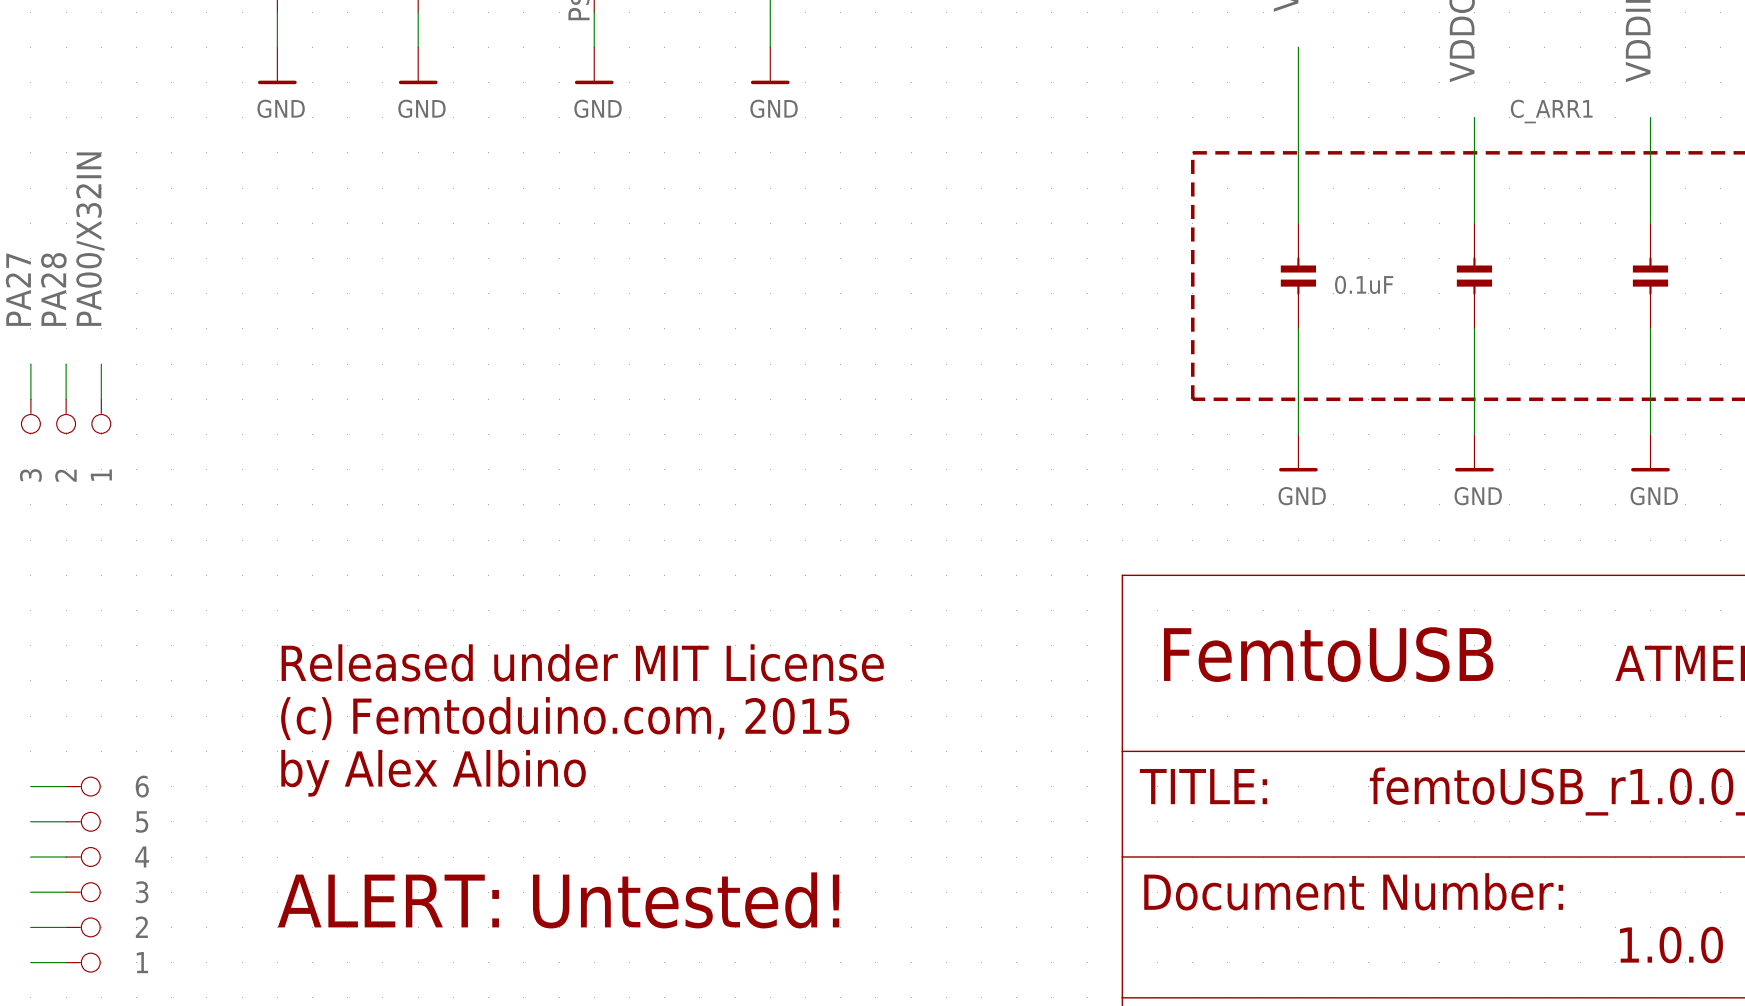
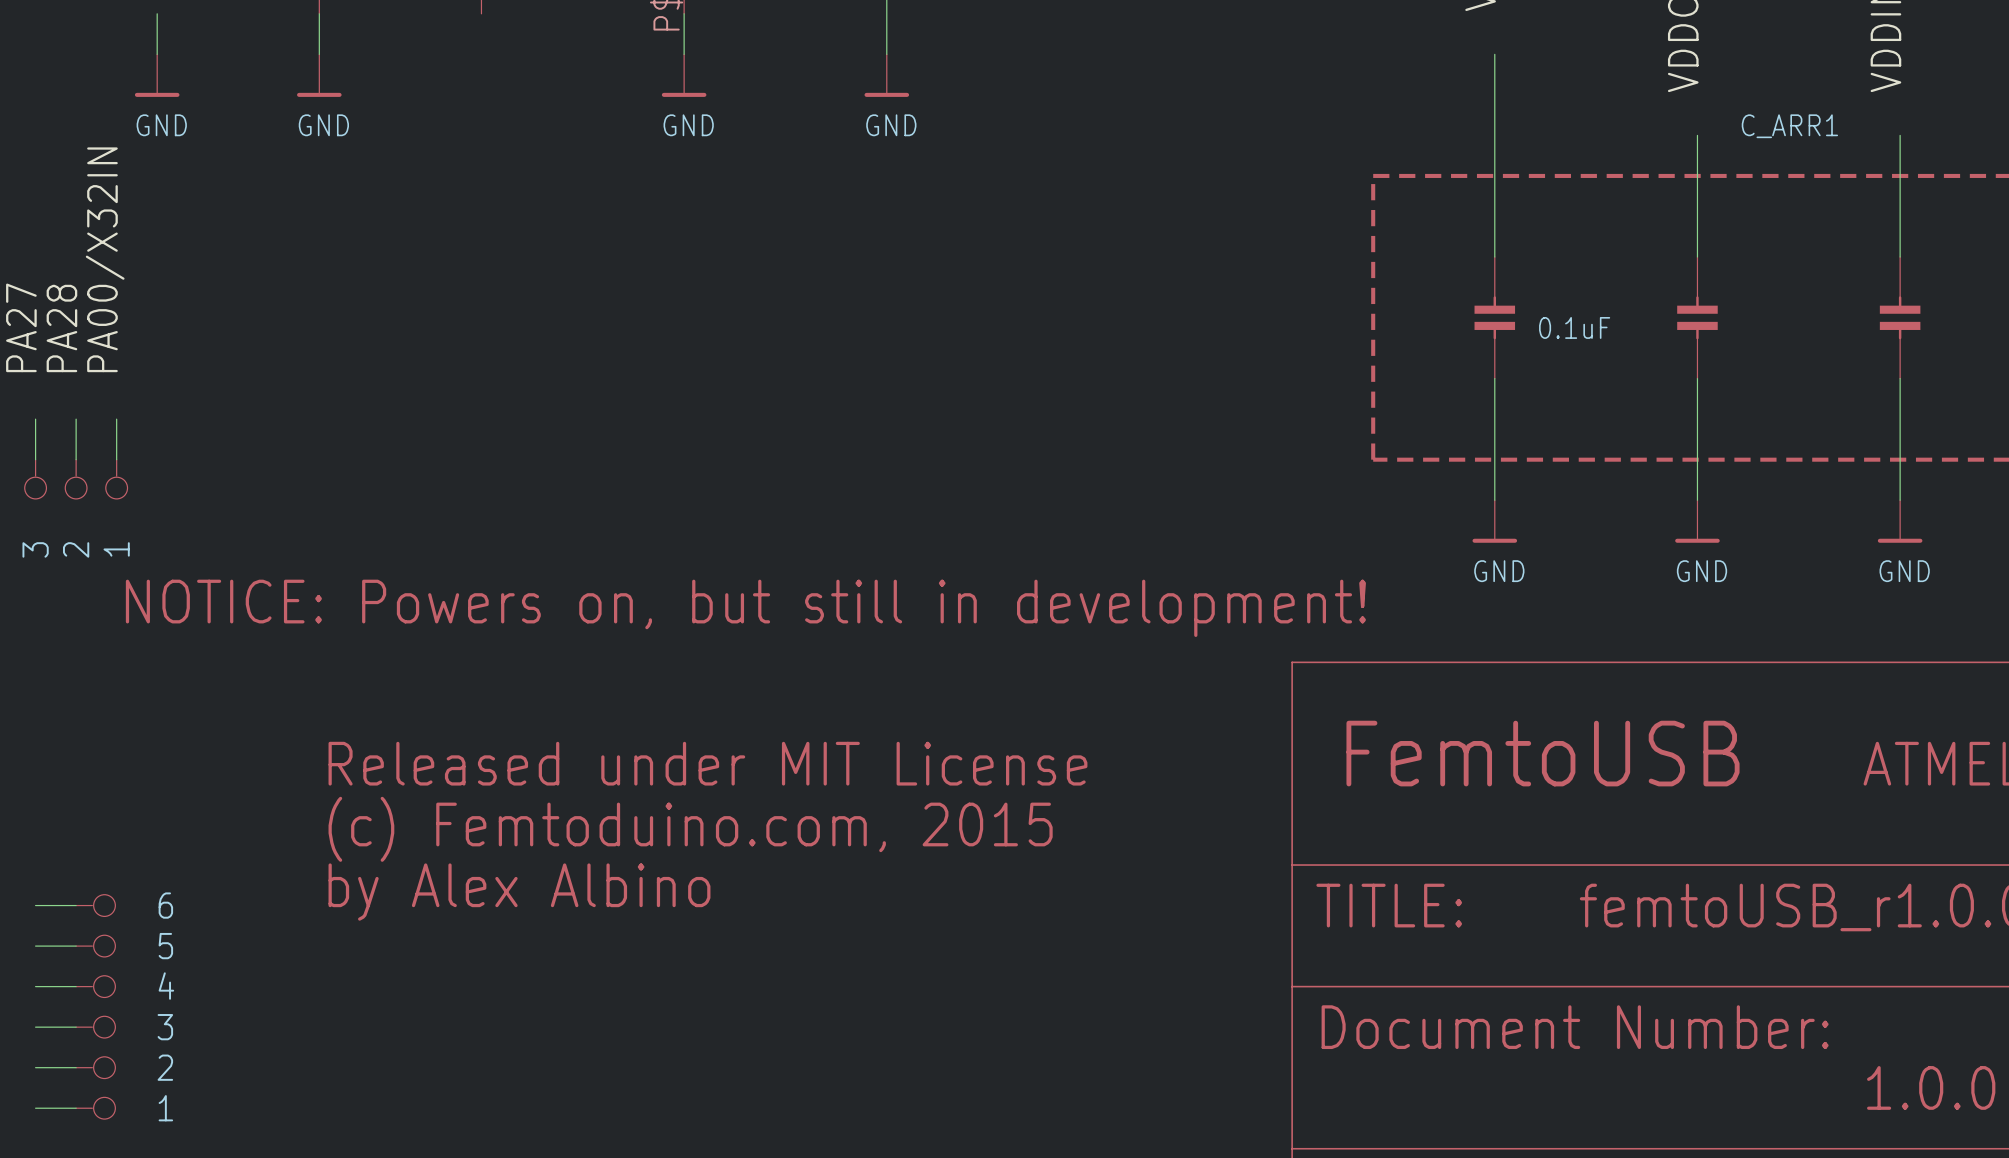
wire: (418, 12) (418, 47) -> (157, 13) (157, 54)
power symbol position: GND (418, 65) -> GND (157, 75)
text: none -> NOTICE: Powers on, but still in development! (745, 608)
text: ALERT: Untested! (558, 900) -> none

